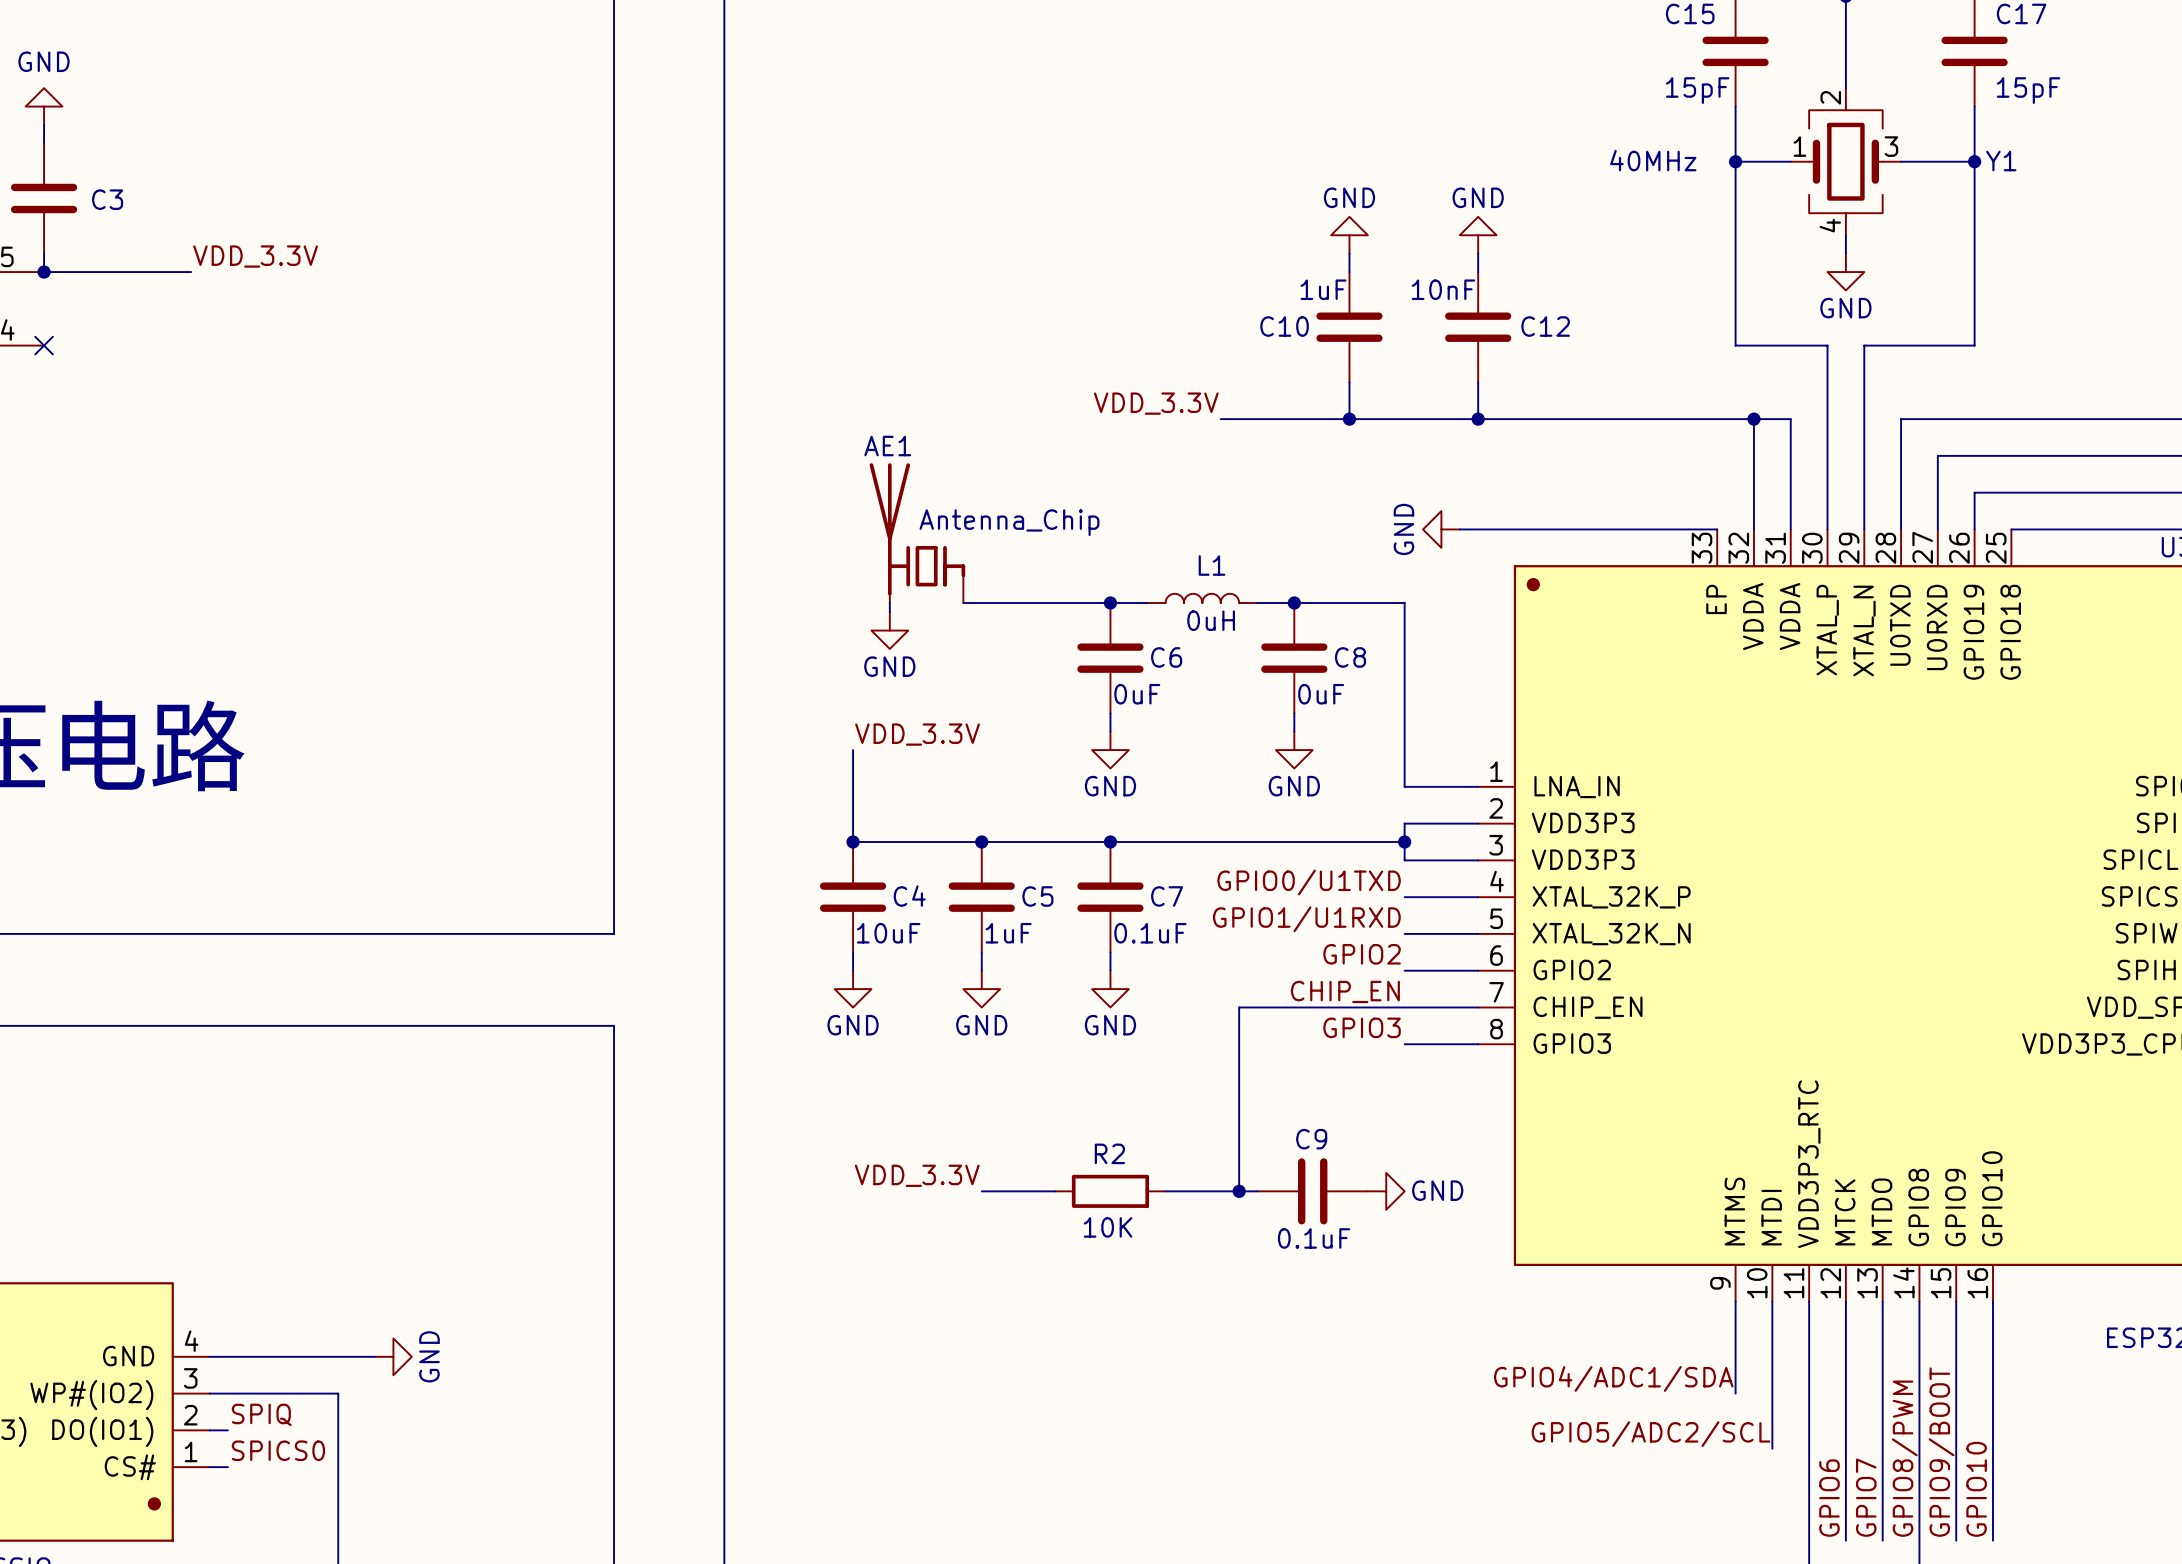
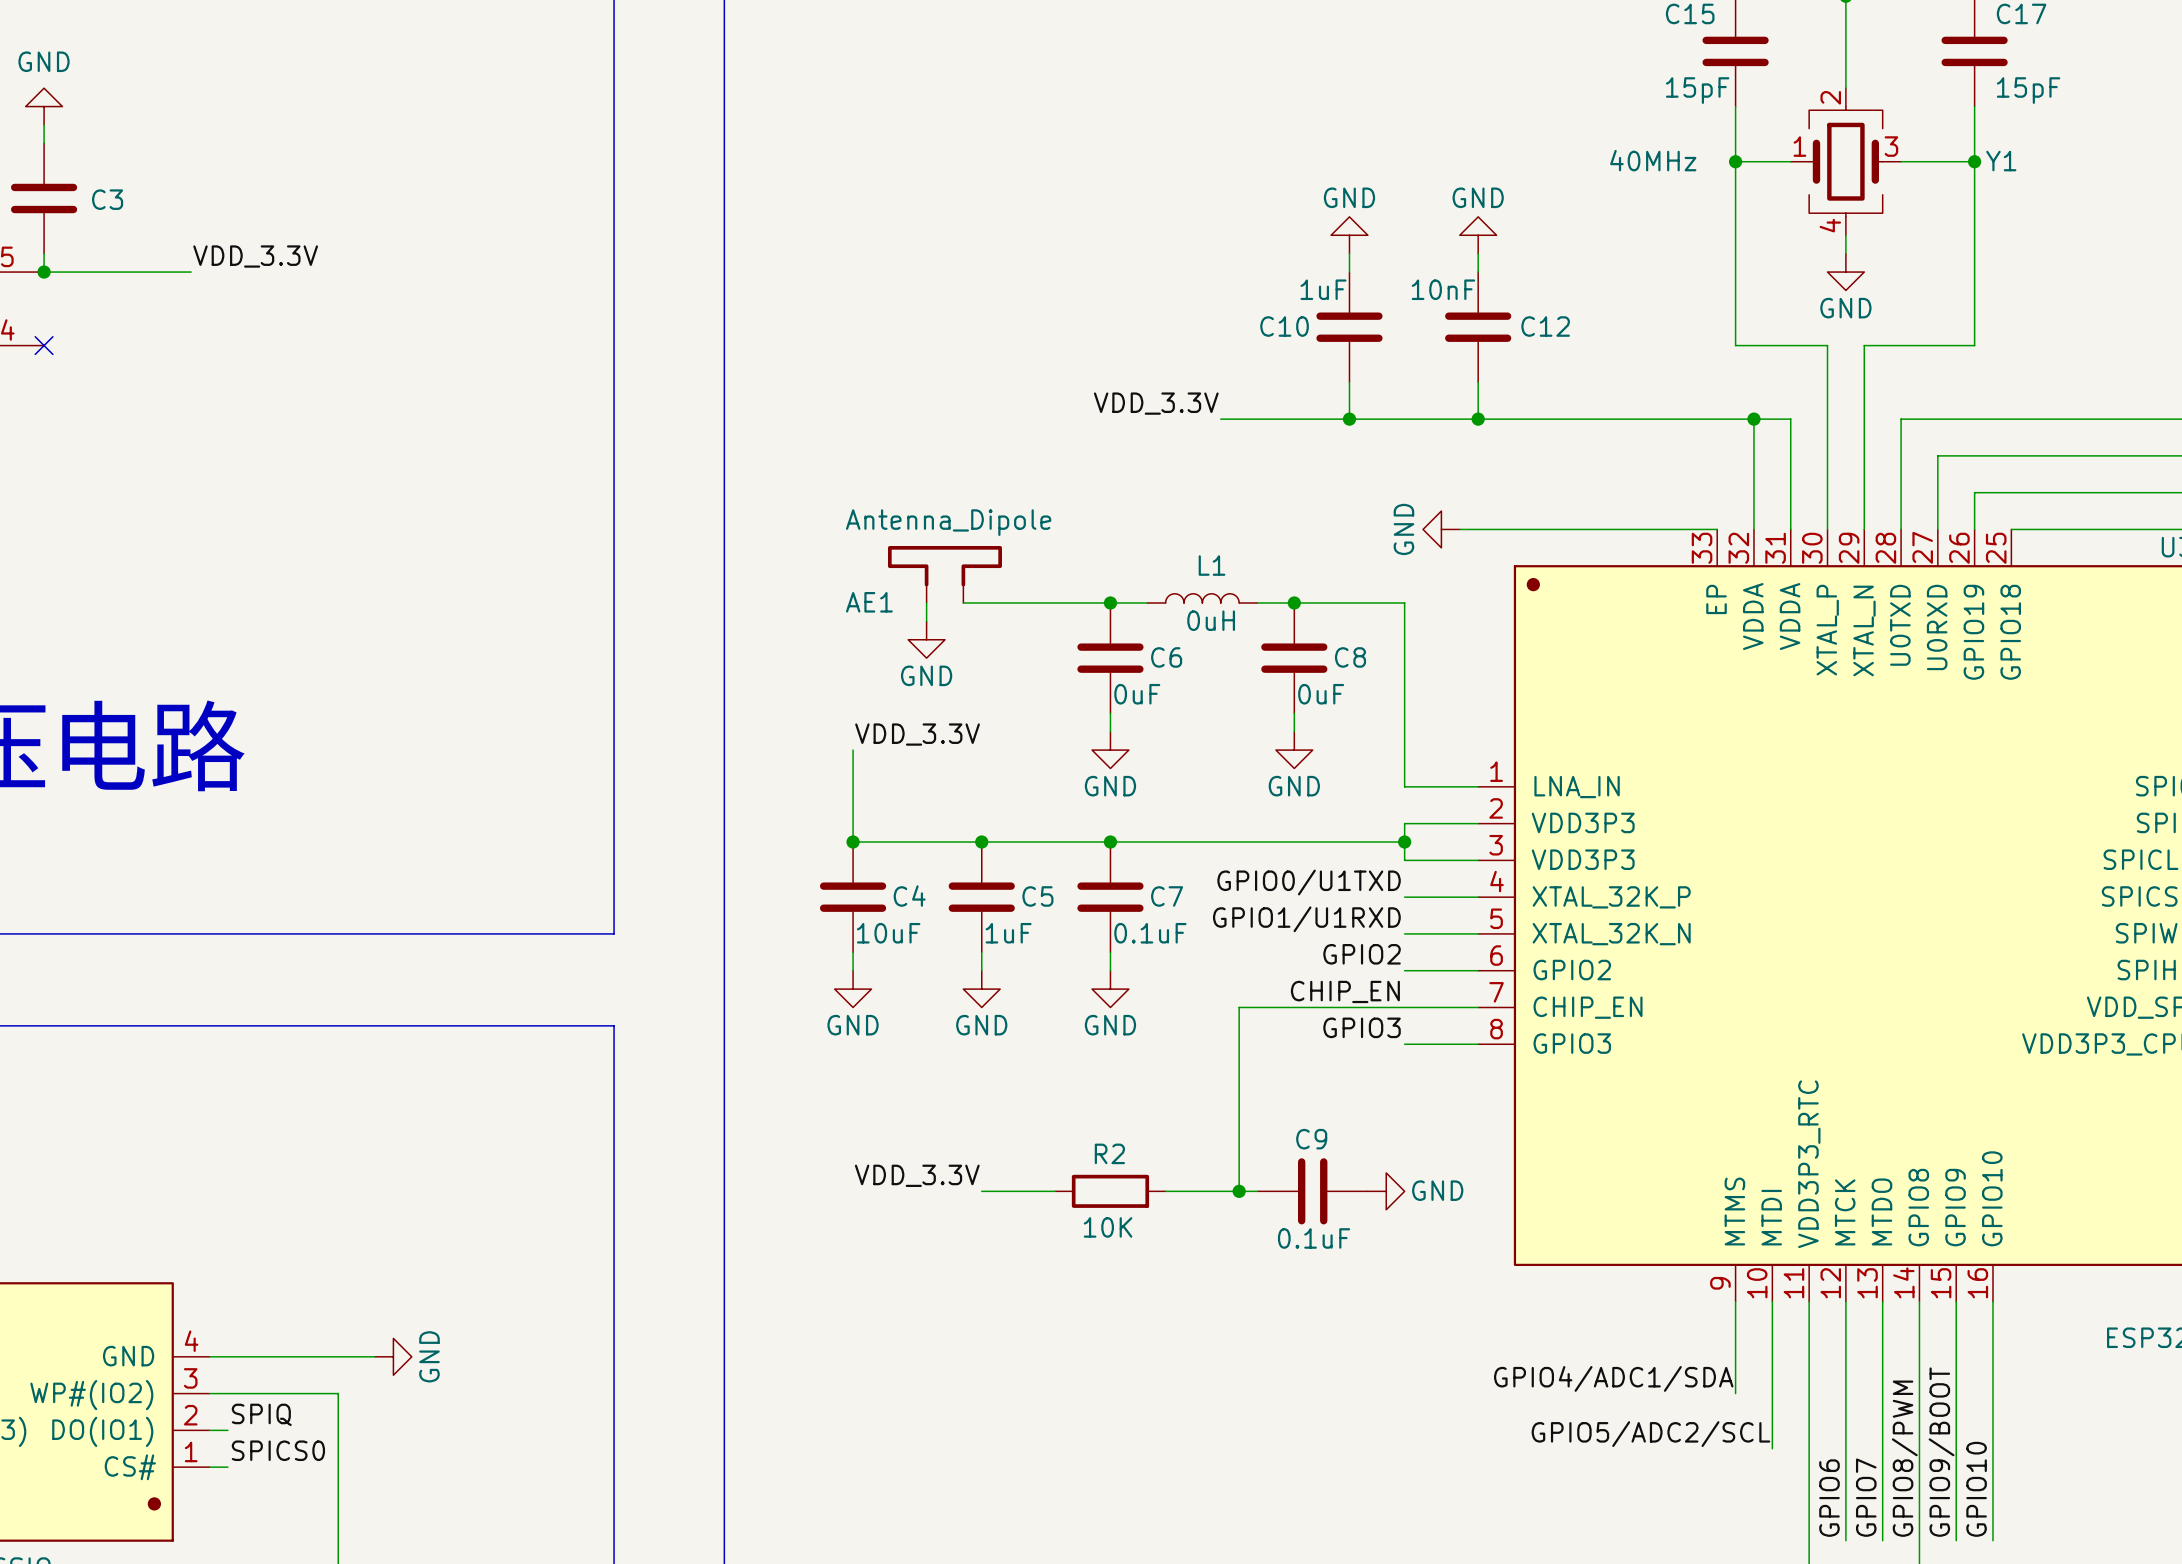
AE1 name position: AE1 (887, 446) -> AE1 (869, 602)
AE1 symbol: [869, 463, 966, 603] -> [887, 545, 1002, 603]
AE1 value: Antenna_Chip (1009, 522) -> Antenna_Dipole (948, 522)
wire: (889, 602) (889, 612) -> none
wire: none -> (926, 602) (926, 621)
power symbol position: GND (889, 630) -> GND (926, 639)

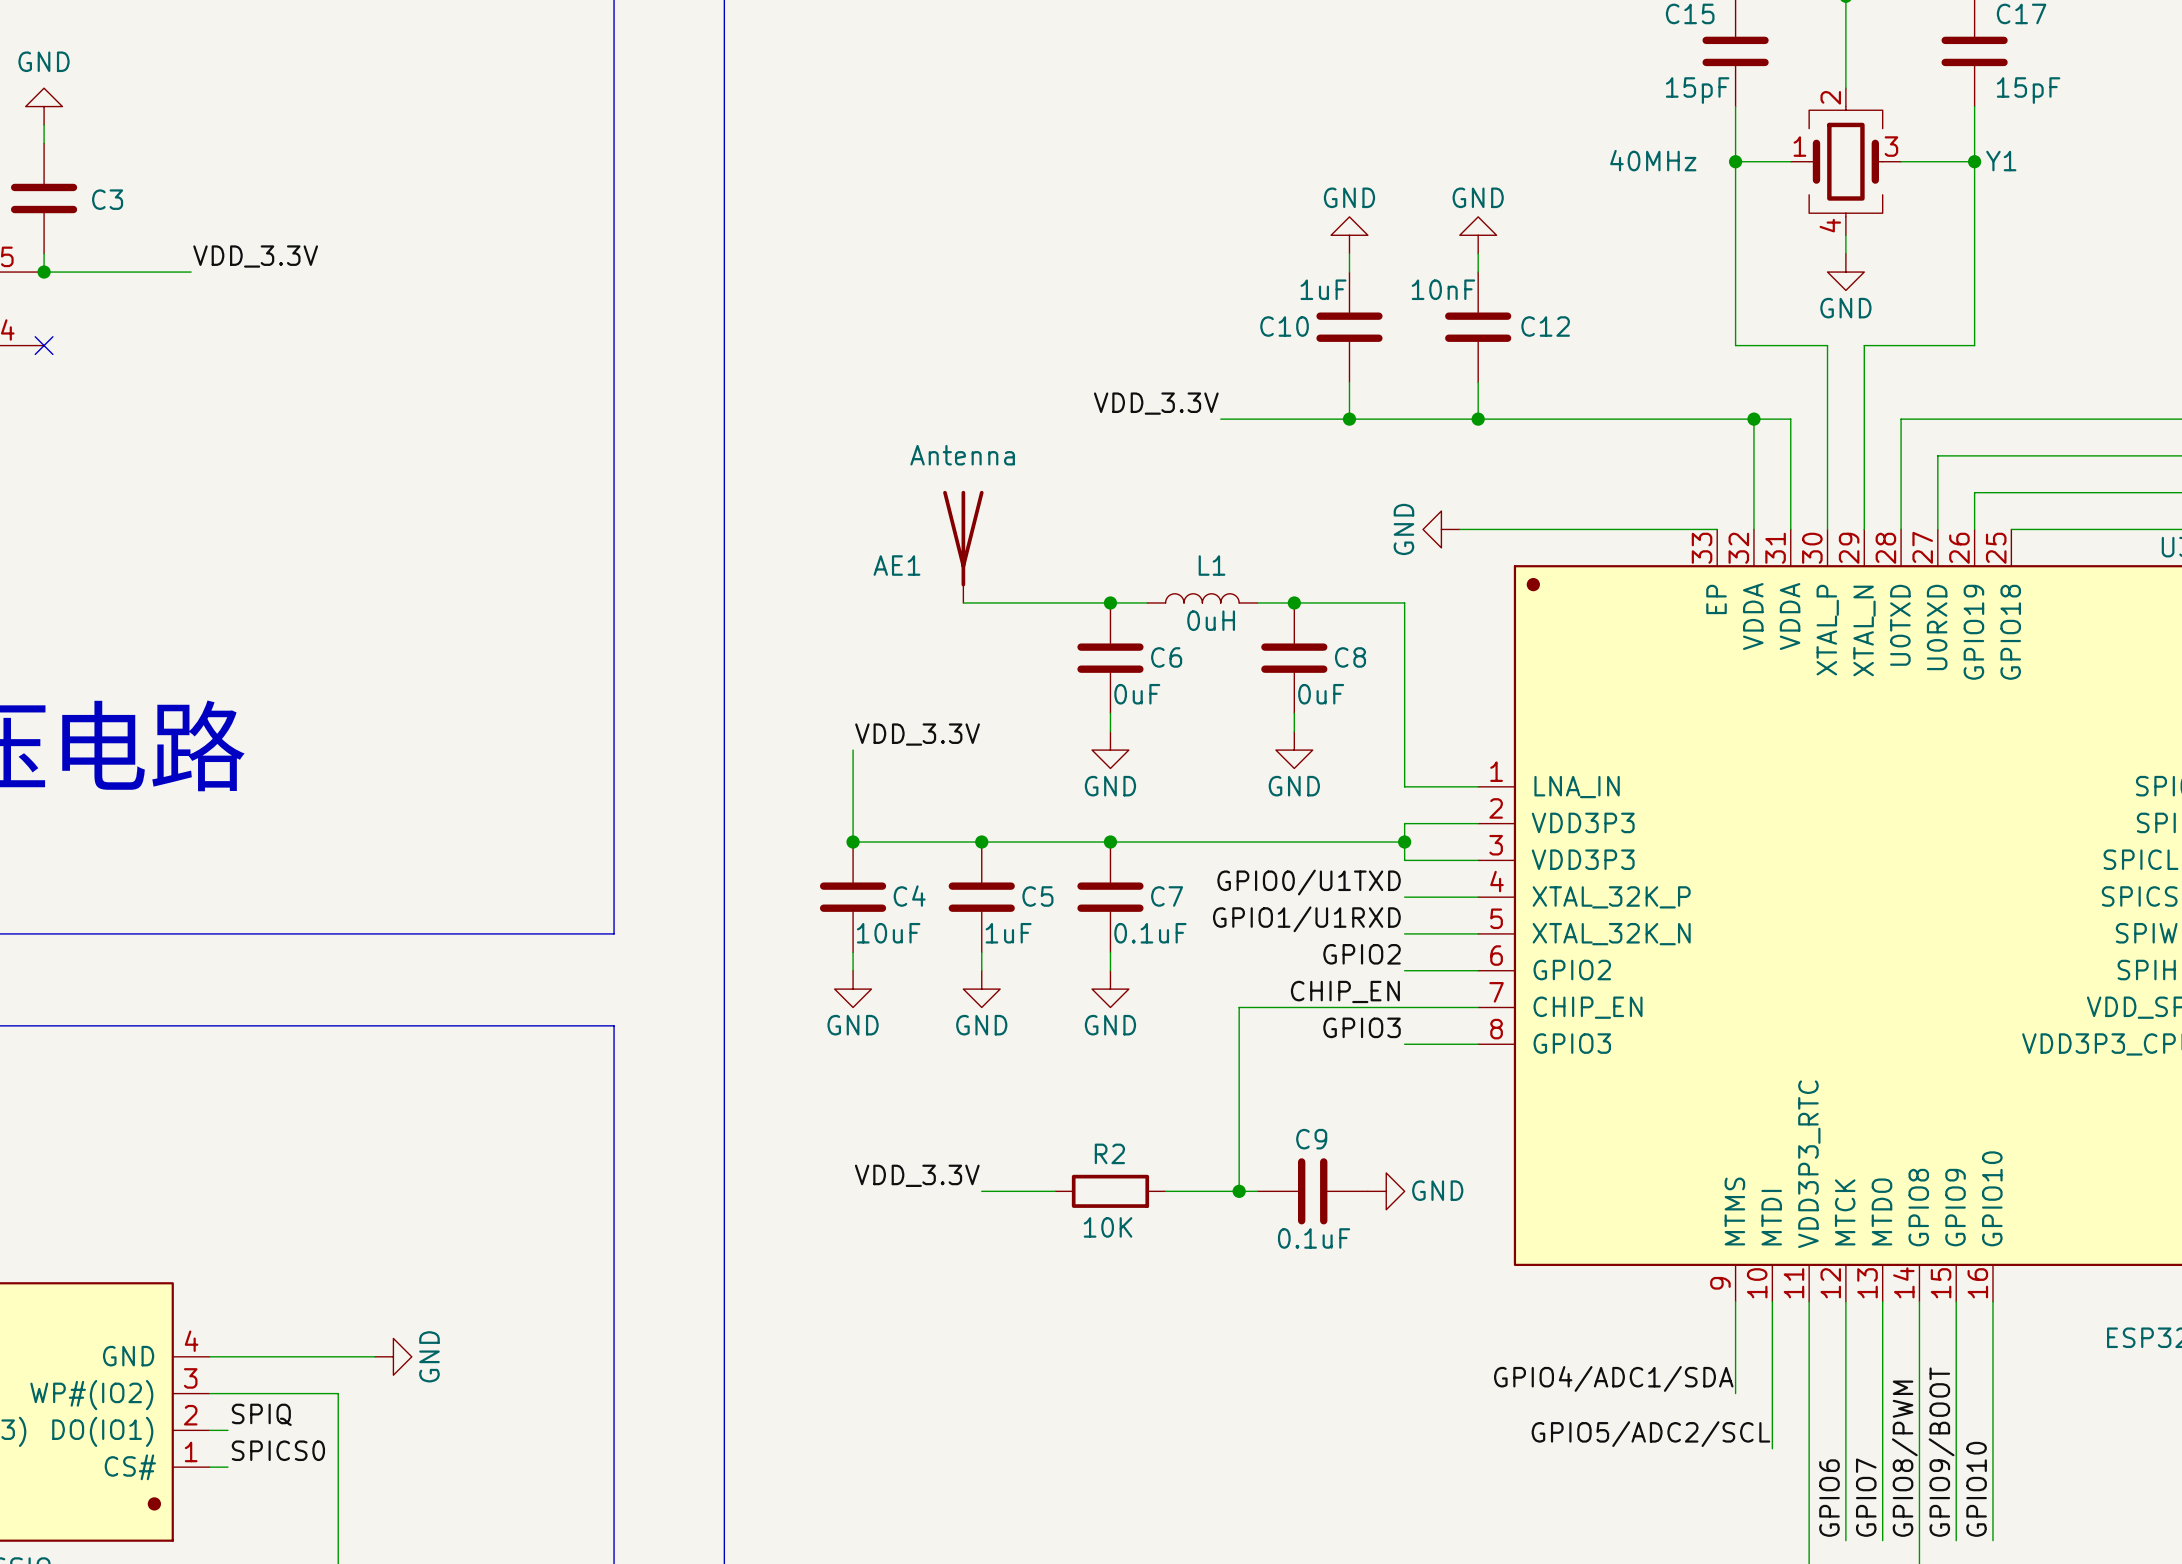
AE1 value: Antenna_Dipole (948, 522) -> Antenna (962, 455)
AE1 symbol: [887, 545, 1002, 603] -> [943, 490, 984, 603]
wire: (926, 602) (926, 621) -> none
power symbol: GND (926, 639) -> none

